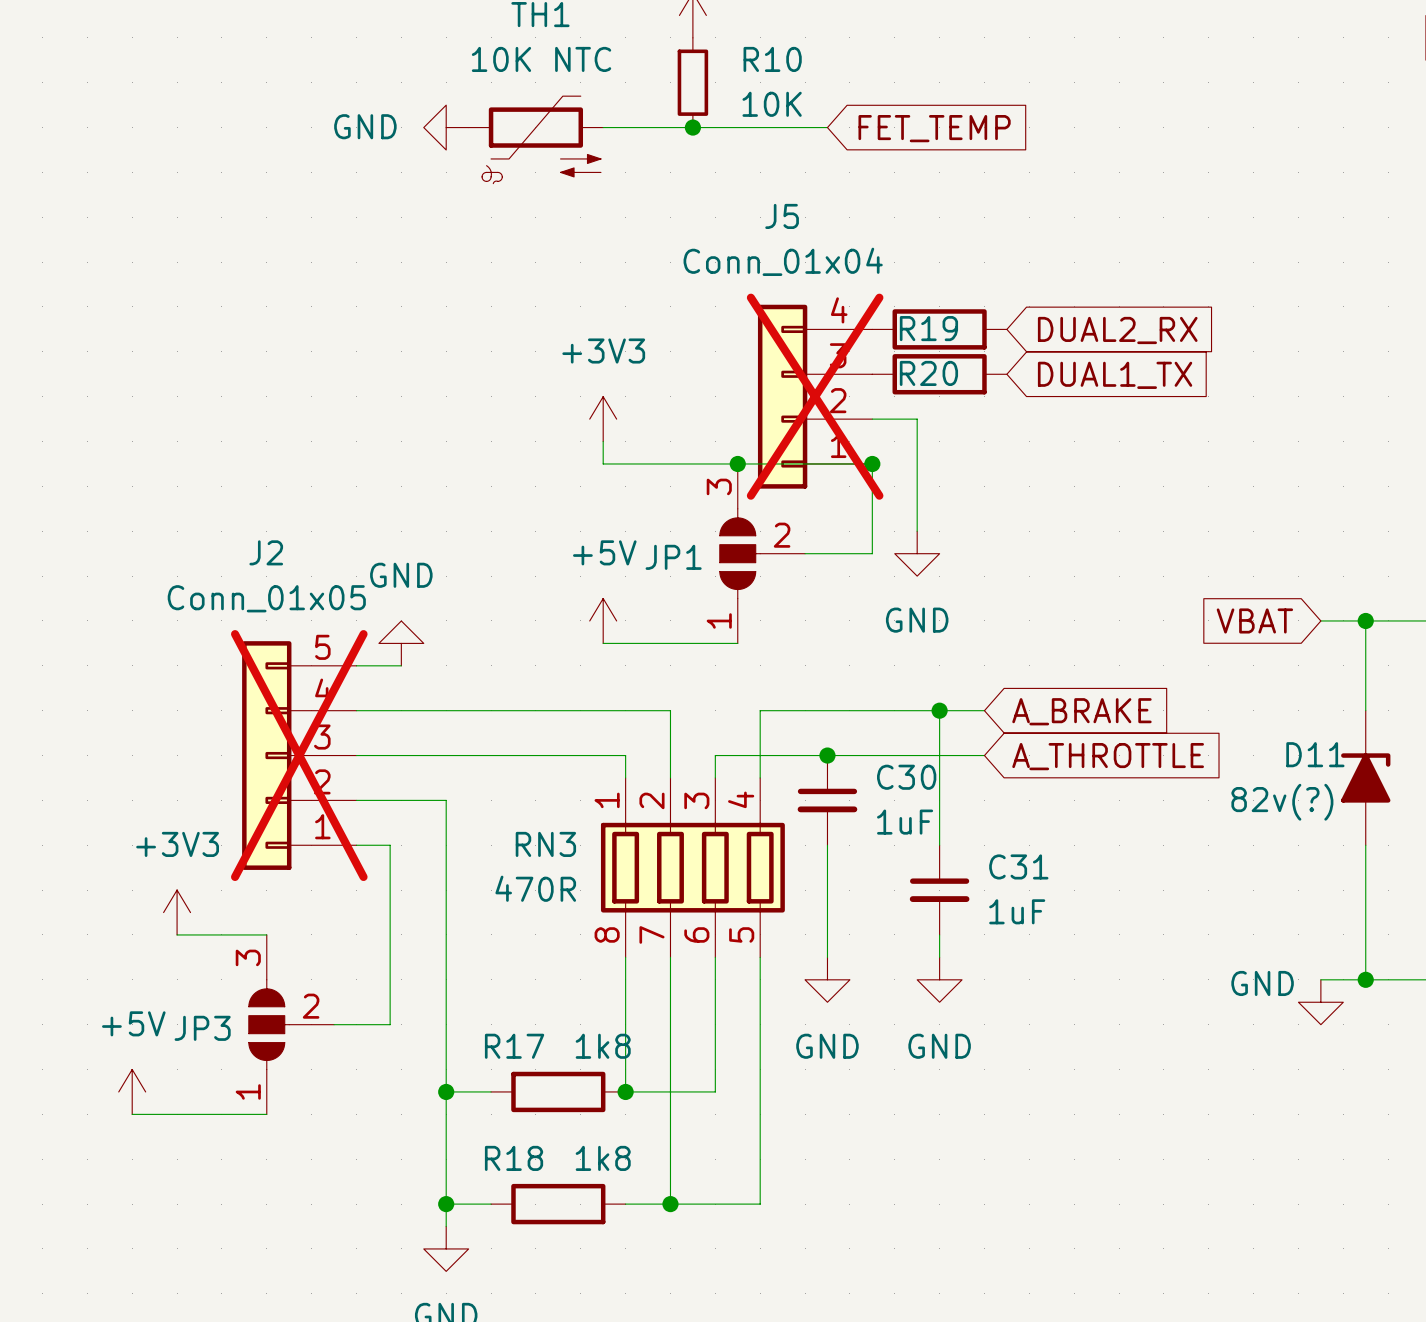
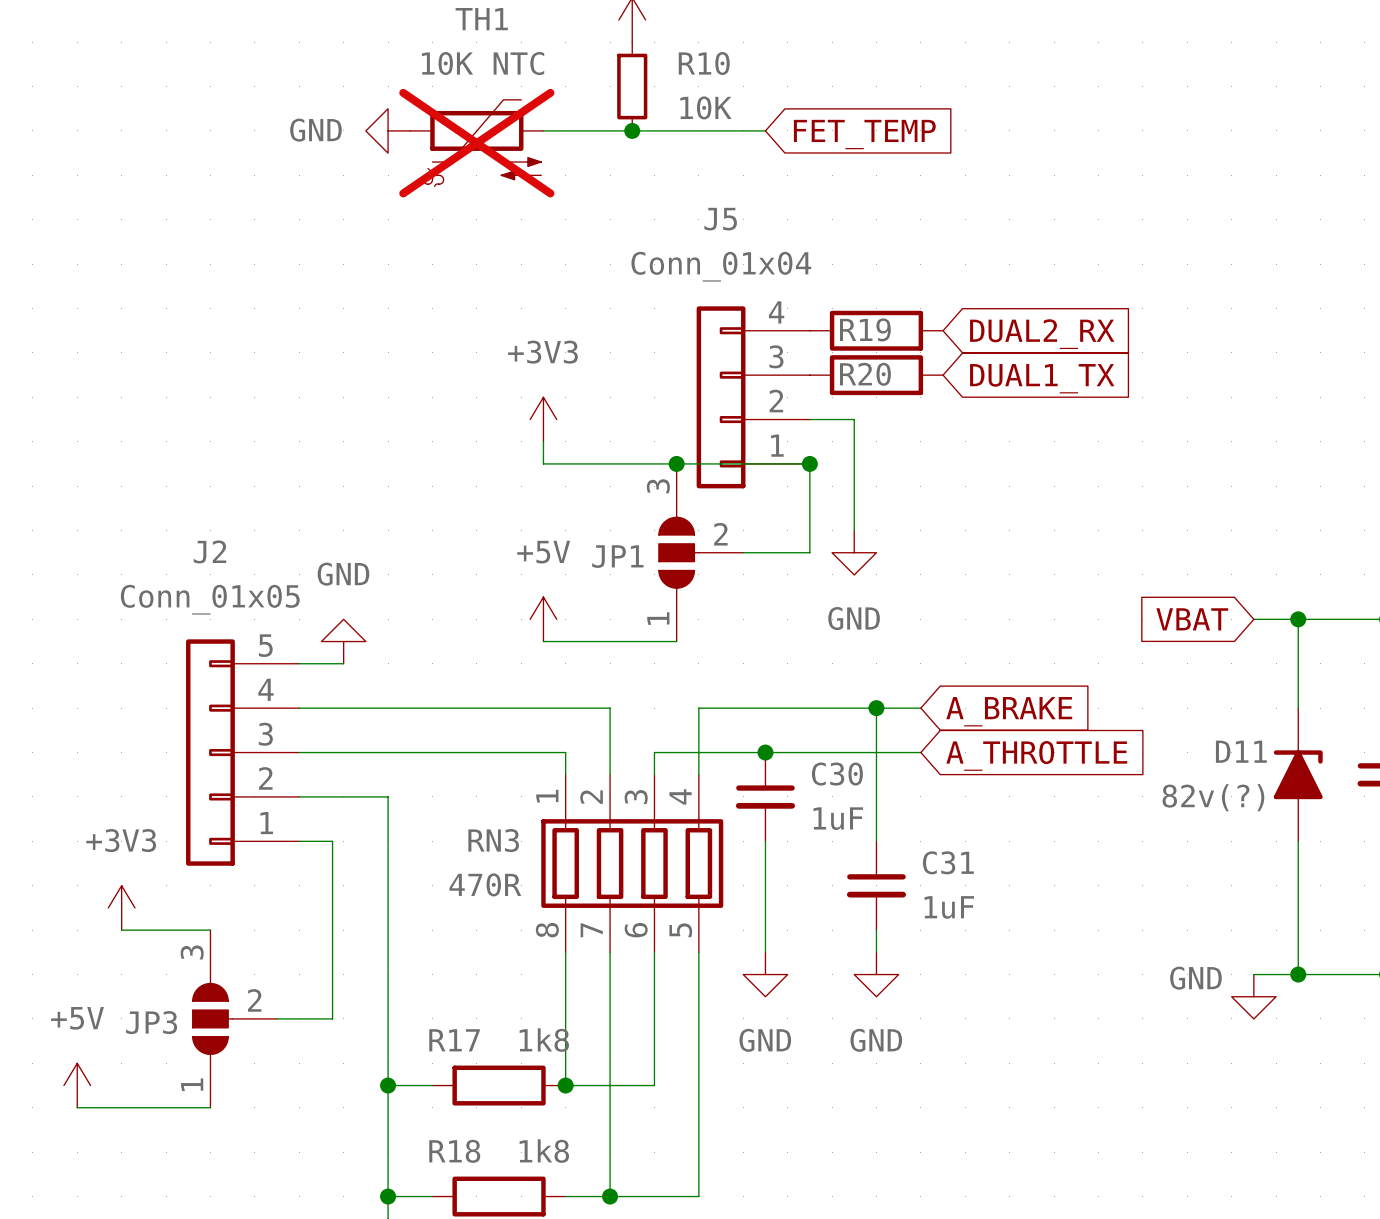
TH1 do-not-place cross: none -> (476, 143)
J5 do-not-place cross: (815, 396) -> none
J2 do-not-place cross: (299, 755) -> none

